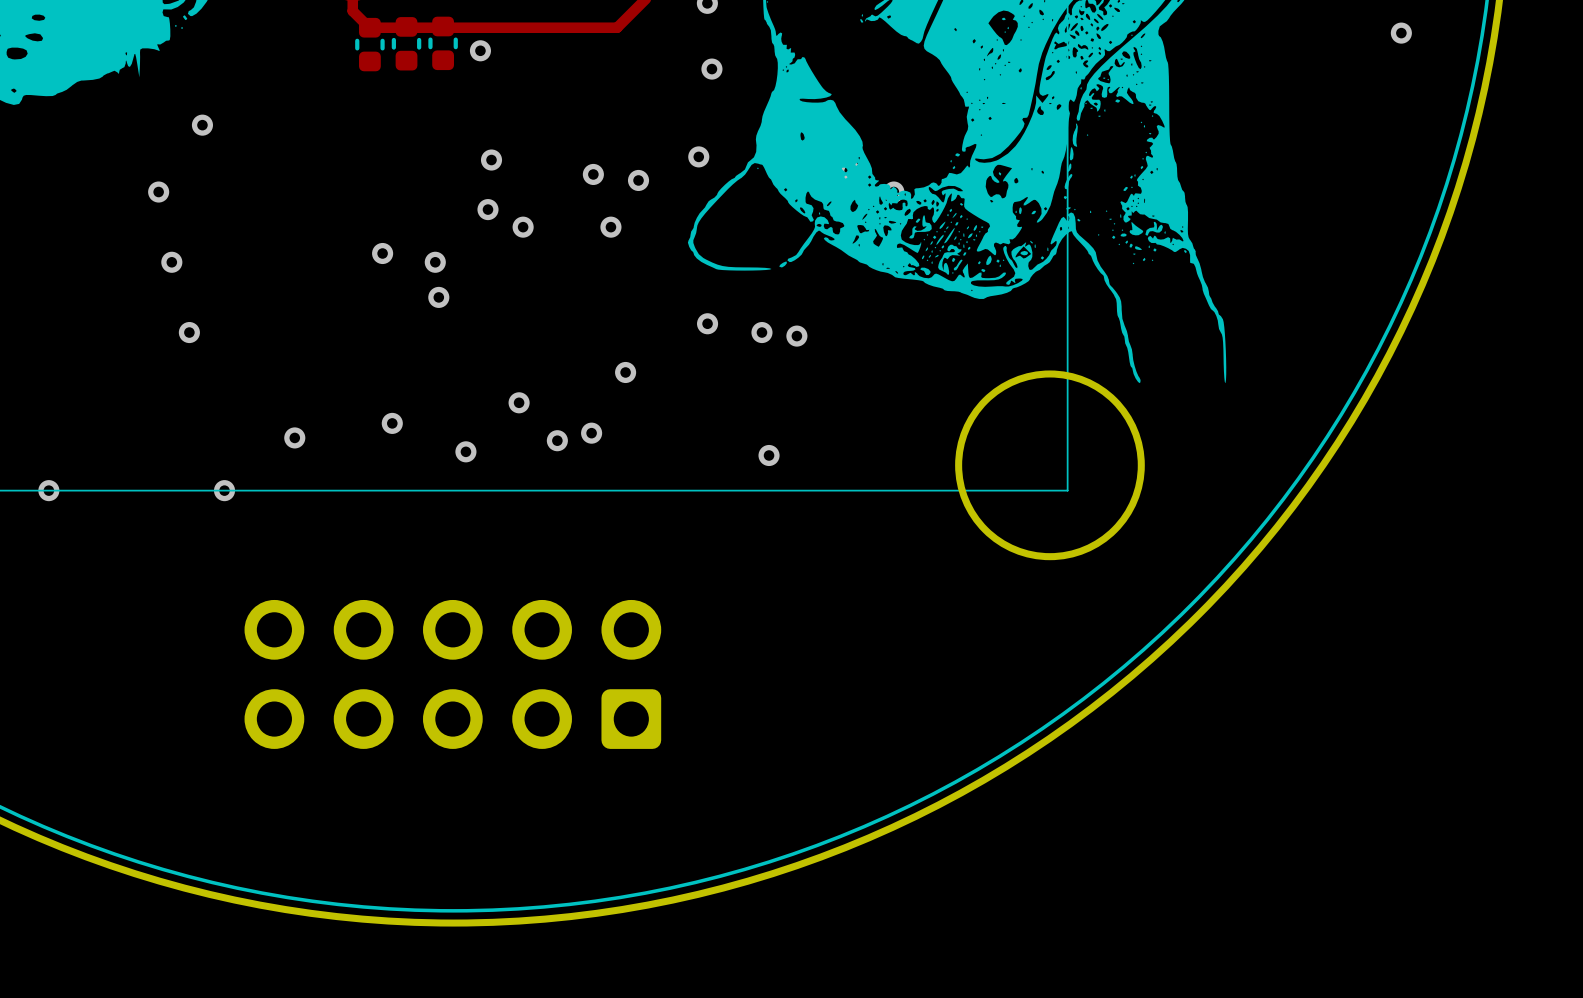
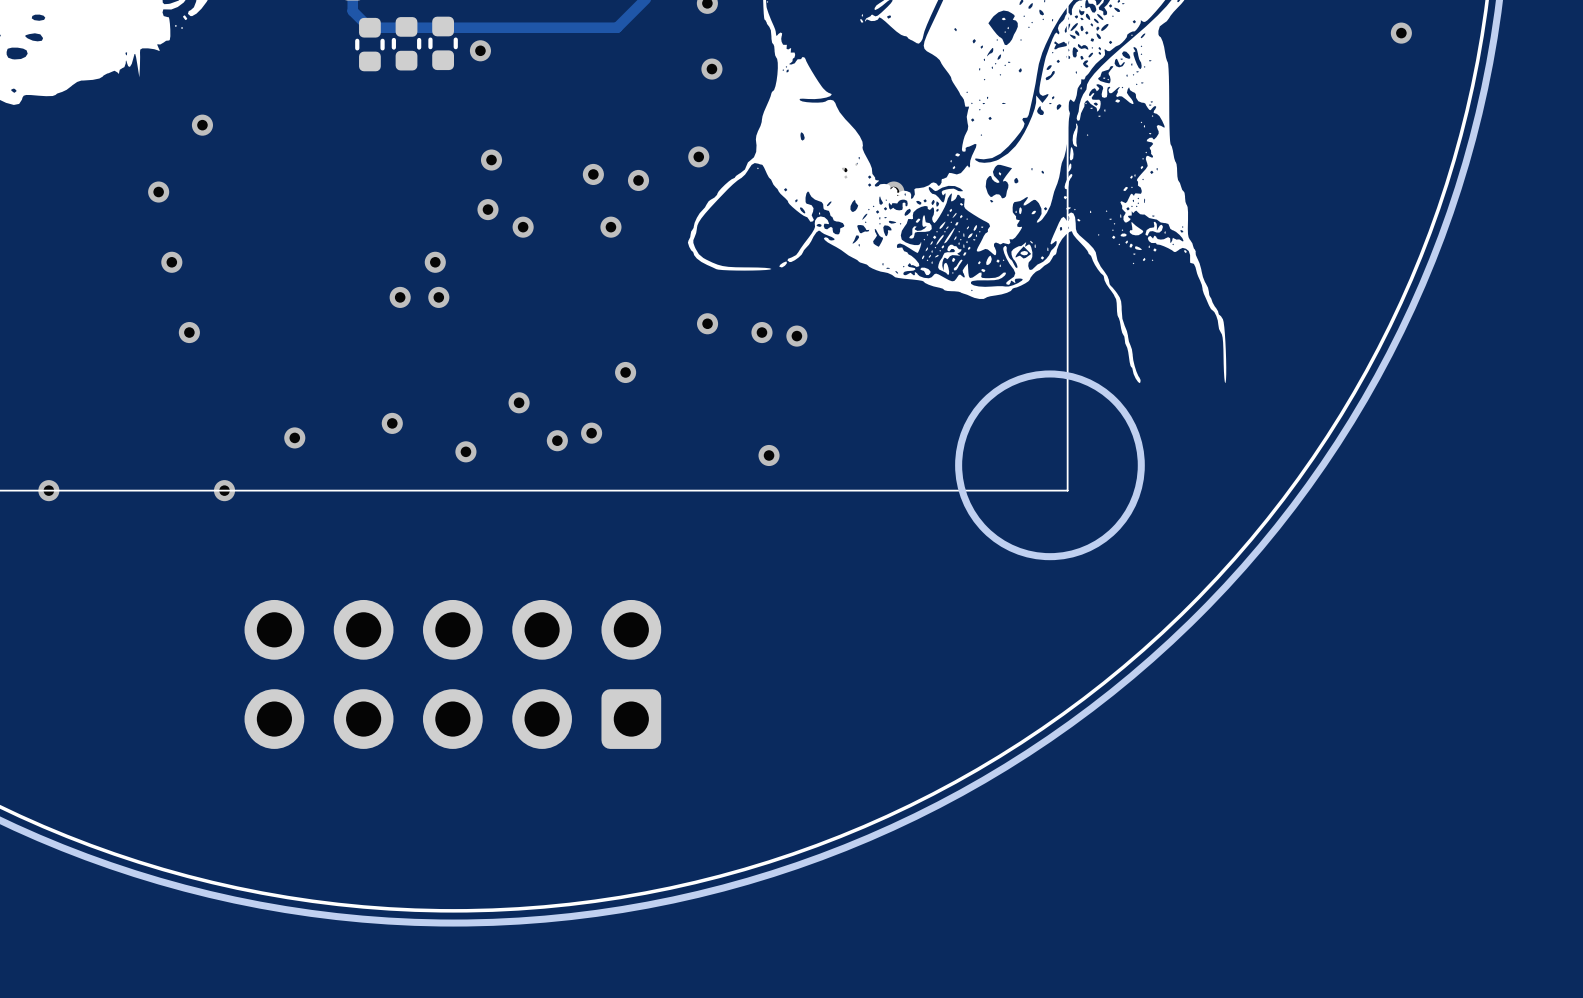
via position: (382, 253) -> (400, 297)

